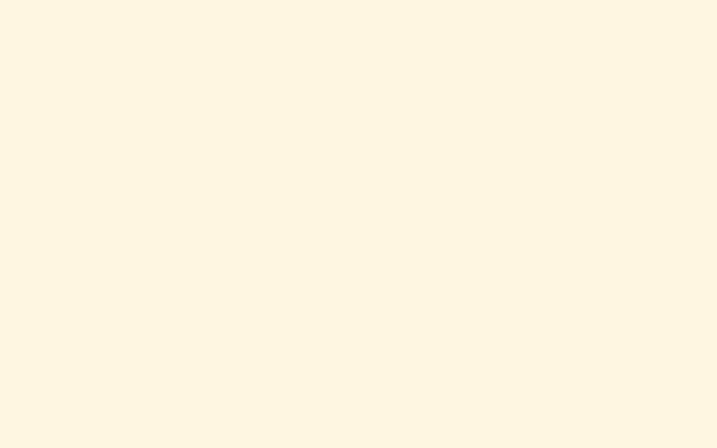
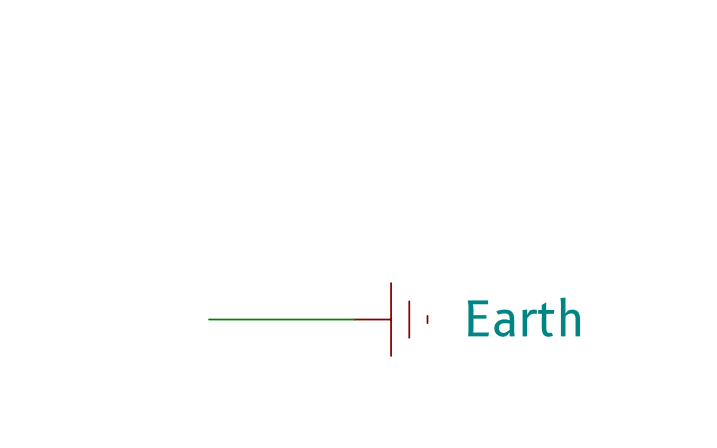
wire: none -> (209, 319) (354, 319)
power symbol: none -> Earth (391, 319)

